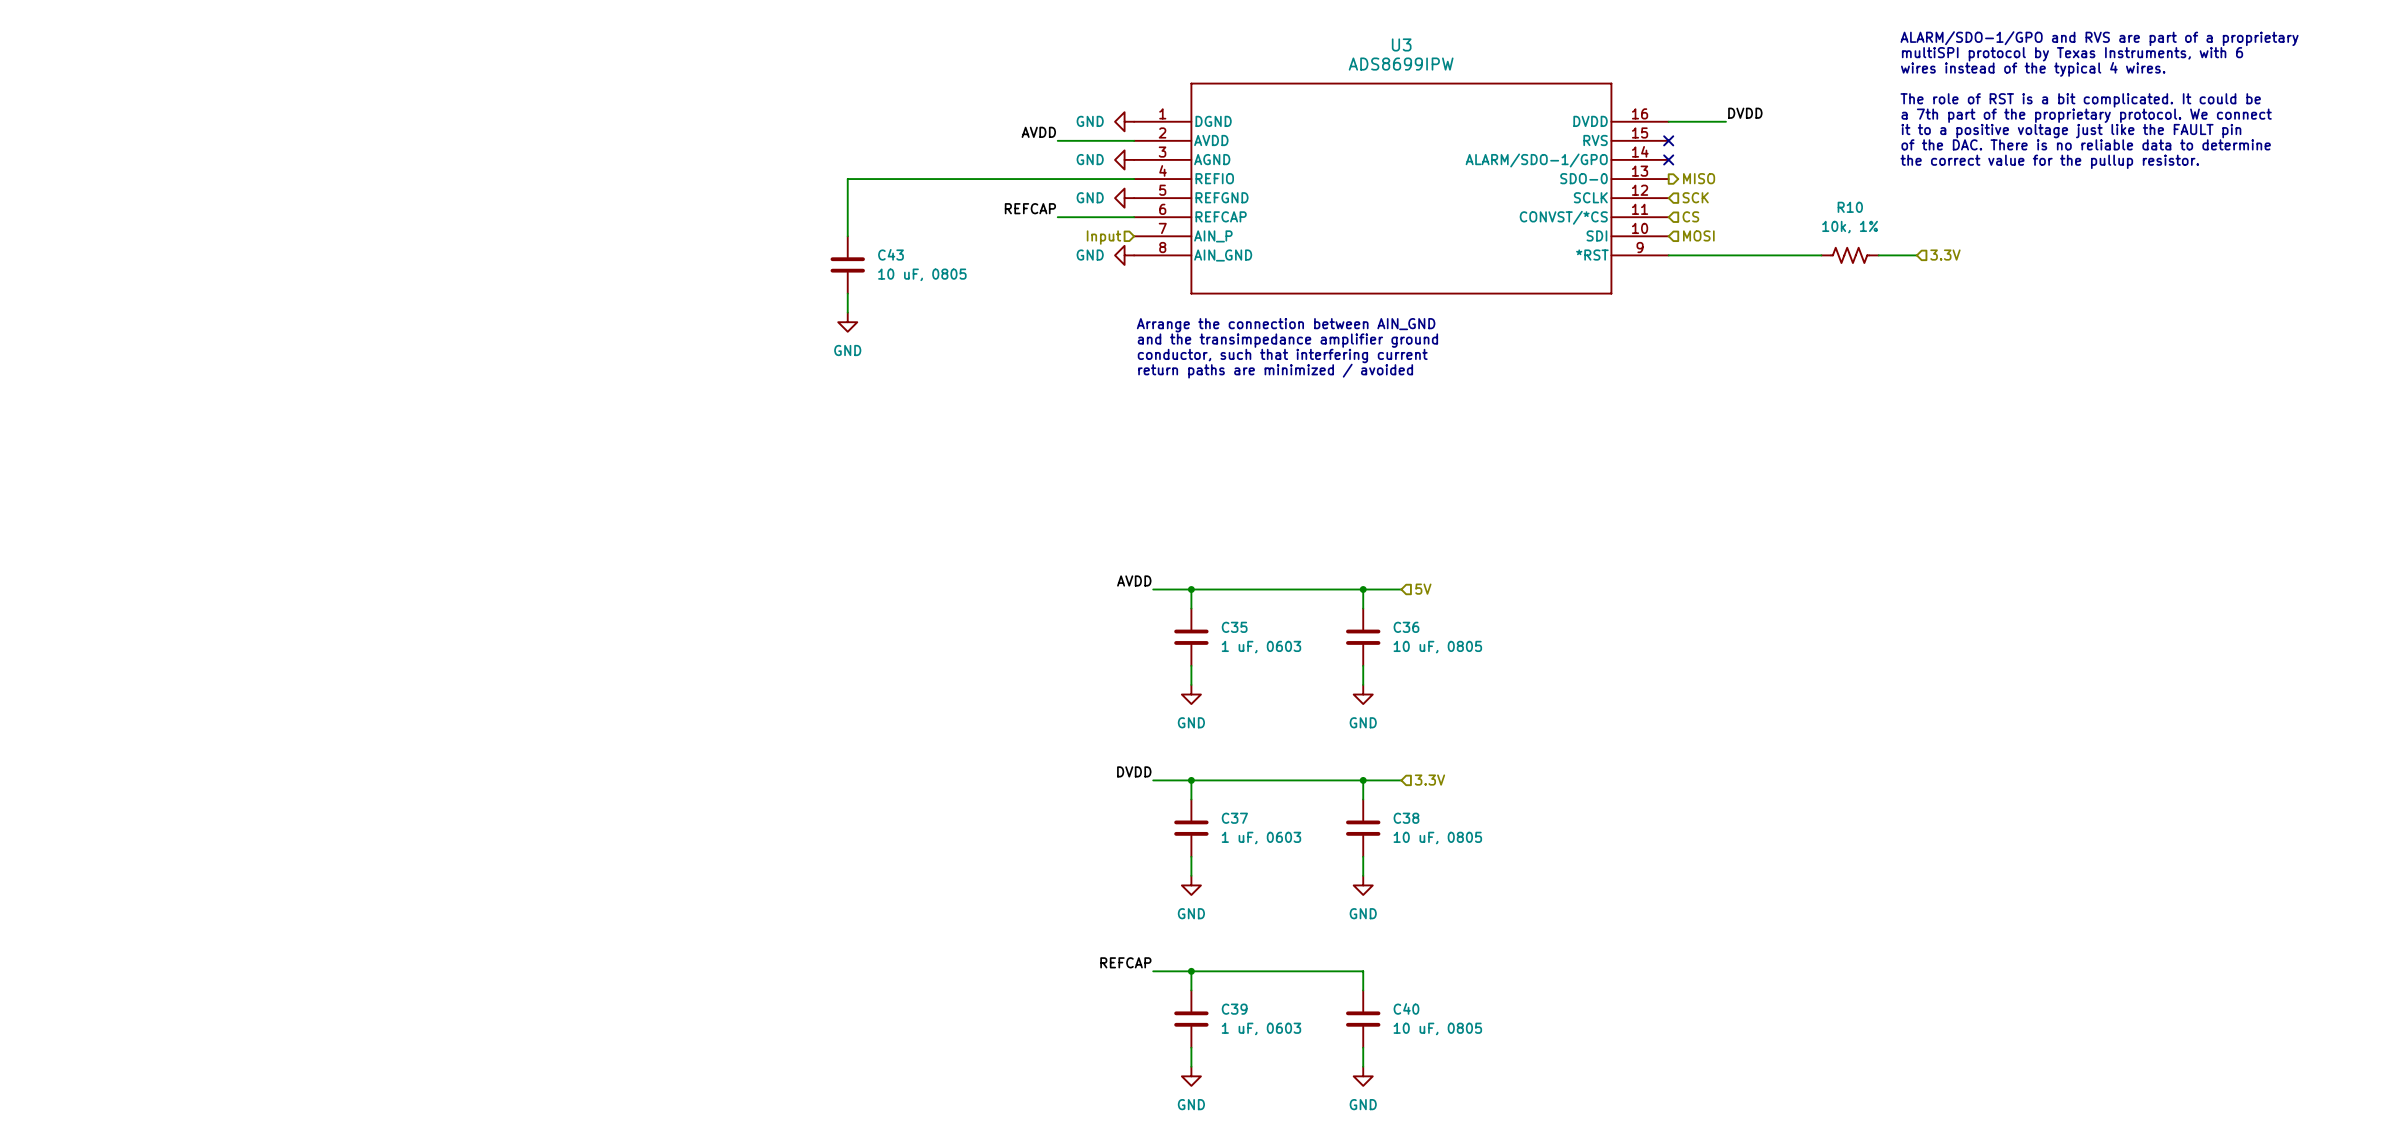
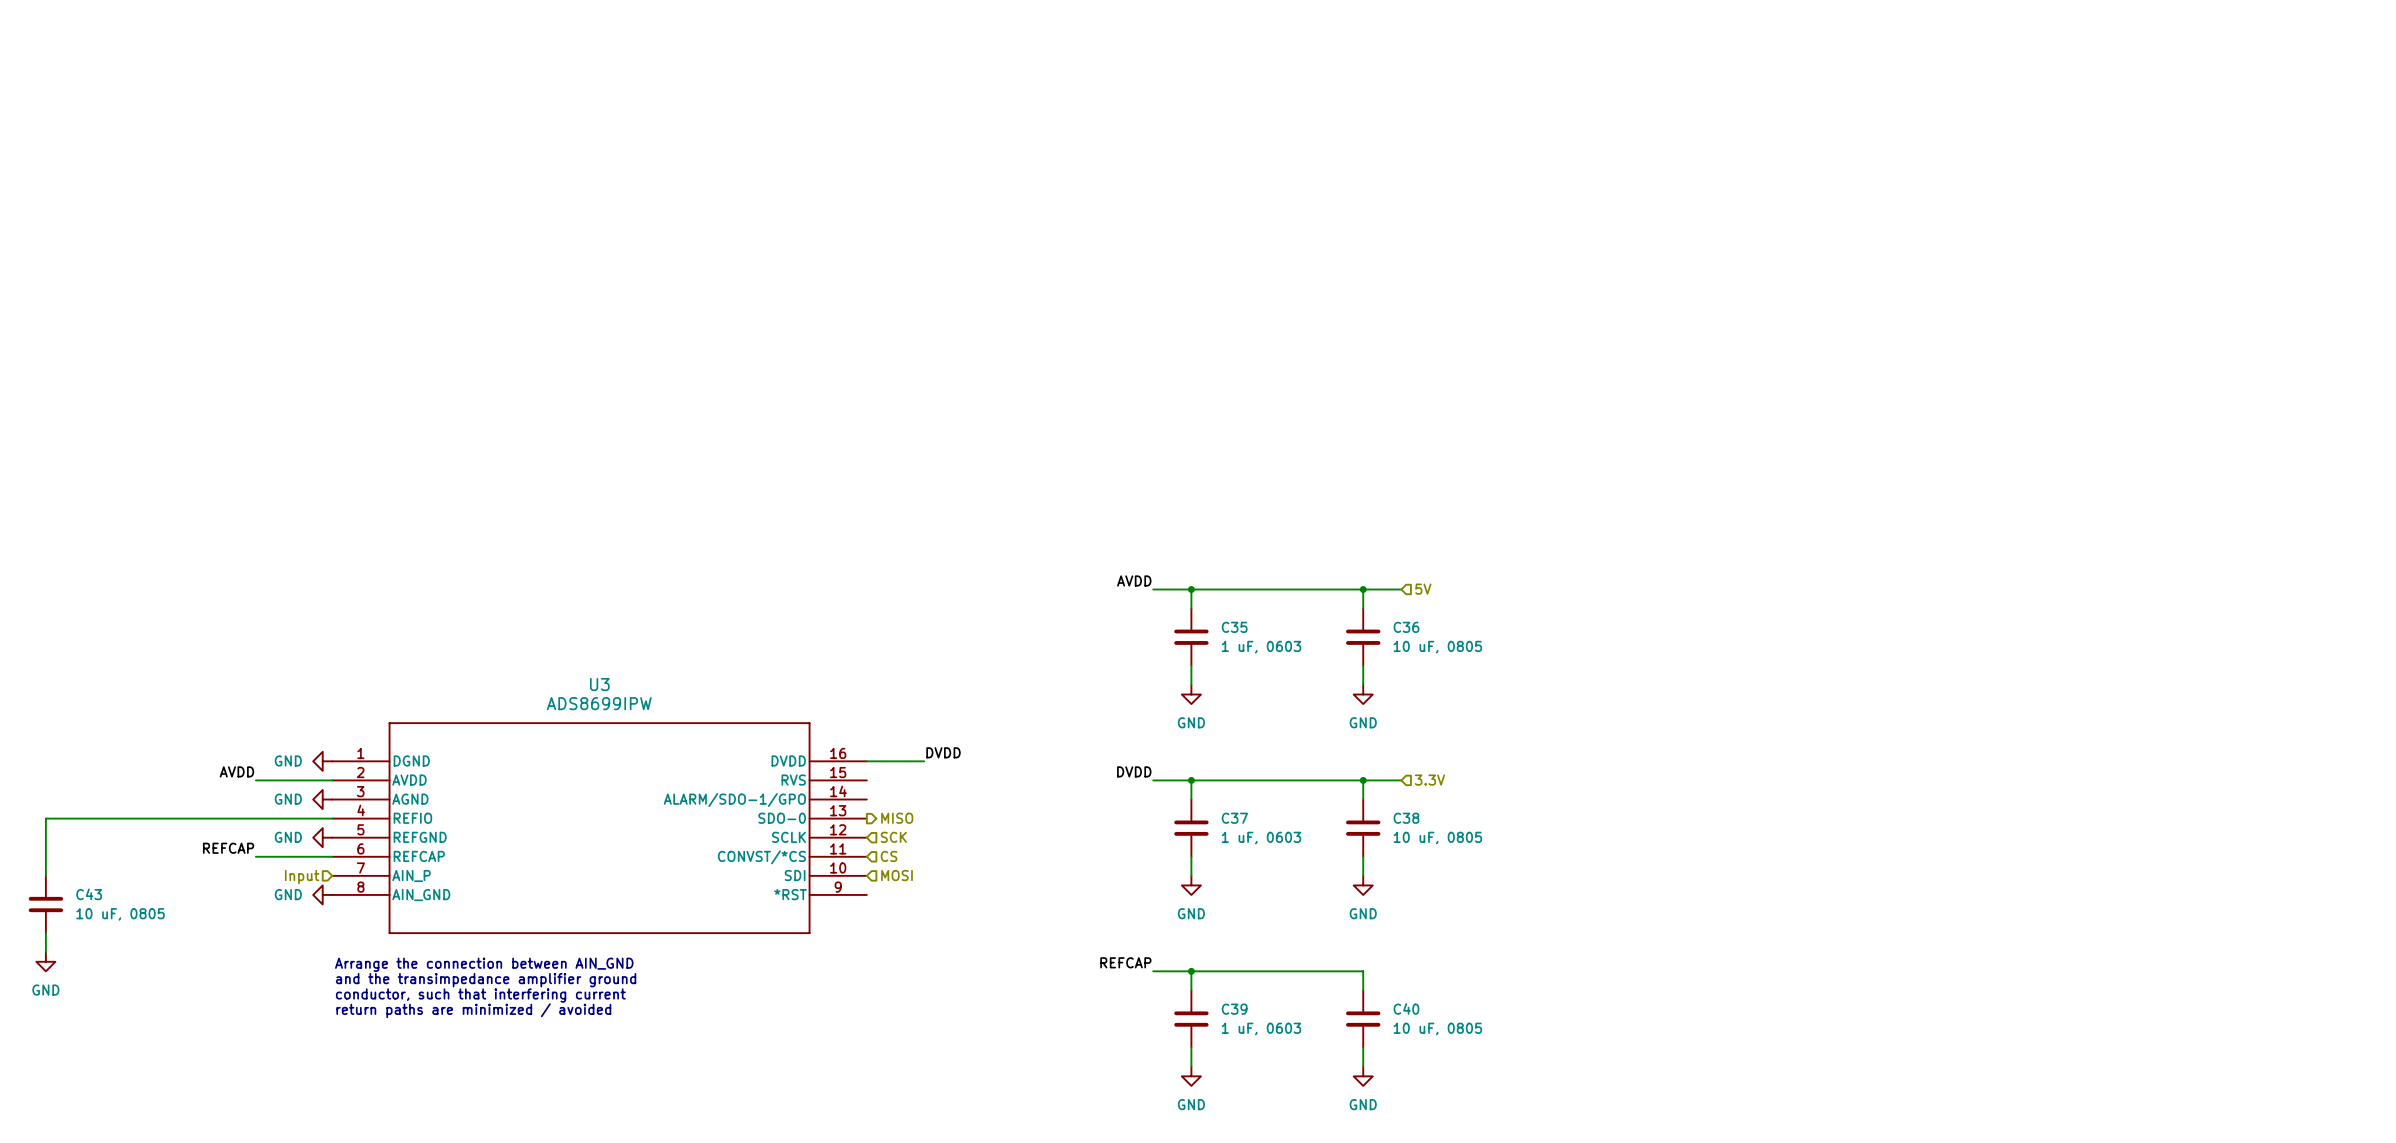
text: ALARM/SDO-1/GPO and RVS are part of a proprietary (2099, 38) -> none
text: multiSPI protocol by Texas Instruments, with 6 (2072, 54) -> none
text: wires instead of the typical 4 wires. (2033, 69) -> none
text: The role of RST is a bit complicated. It could be (2080, 100) -> none
label: DVDD (1745, 113) -> none
text: a 7th part of the proprietary protocol. We connect (2086, 115) -> none
power symbol: GND (1124, 121) -> none
wire: (1668, 121) (1725, 121) -> none
text: it to a positive voltage just like the FAULT pin (2071, 131) -> none
label: AVDD (1038, 132) -> none
wire: (1057, 140) (1134, 140) -> none
no-connect mark: (1668, 140) -> none
text: of the DAC. There is no reliable data to determine (2086, 144) -> none
power symbol: GND (1124, 159) -> none
no-connect mark: (1668, 159) -> none
text: the correct value for the pullup resistor. (2049, 161) -> none
hierarchical label: MISO (1699, 178) -> none
wire: (1134, 179) (847, 179) (847, 236) -> none
U3 position: (1401, 188) -> (599, 828)
hierarchical label: SCK (1695, 197) -> none
power symbol: GND (1124, 198) -> none
label: REFCAP (1030, 208) -> none
hierarchical label: CS (1690, 216) -> none
wire: (1057, 217) (1134, 217) -> none
hierarchical label: MOSI (1698, 235) -> none
hierarchical label: Input (1103, 237) -> none
power symbol: GND (1124, 255) -> none
wire: (1668, 255) (1821, 255) -> none
R10: 10k, 1% (1850, 255) -> none
wire: (1878, 255) (1916, 255) -> none
hierarchical label: 3.3V (1945, 255) -> none
C43 position: (847, 264) -> (45, 904)
wire: (847, 293) (847, 312) -> none
power symbol: GND (847, 322) -> none
text: Arrange the connection between AIN_GND (1286, 325) -> none
text: and the transimpedance amplifier ground (1287, 340) -> none
text: conductor, such that interfering current (1282, 355) -> none
text: return paths are minimized / avoided (1275, 371) -> none
label: none -> DVDD (943, 752)
power symbol: none -> GND (322, 761)
wire: none -> (866, 761) (924, 761)
label: none -> AVDD (236, 771)
wire: none -> (255, 780) (332, 780)
power symbol: none -> GND (322, 799)
wire: none -> (332, 818) (45, 818) (45, 875)
hierarchical label: none -> MISO (897, 818)
power symbol: none -> GND (322, 837)
hierarchical label: none -> SCK (893, 837)
label: none -> REFCAP (228, 848)
wire: none -> (255, 856) (332, 856)
hierarchical label: none -> CS (889, 856)
hierarchical label: none -> MOSI (896, 875)
hierarchical label: none -> Input (302, 877)
power symbol: none -> GND (322, 894)
wire: none -> (45, 933) (45, 952)
power symbol: none -> GND (45, 961)
text: none -> Arrange the connection between AIN_GND (484, 964)
text: none -> and the transimpedance amplifier ground (486, 980)
text: none -> conductor, such that interfering current (480, 995)
text: none -> return paths are minimized / avoided (473, 1010)

